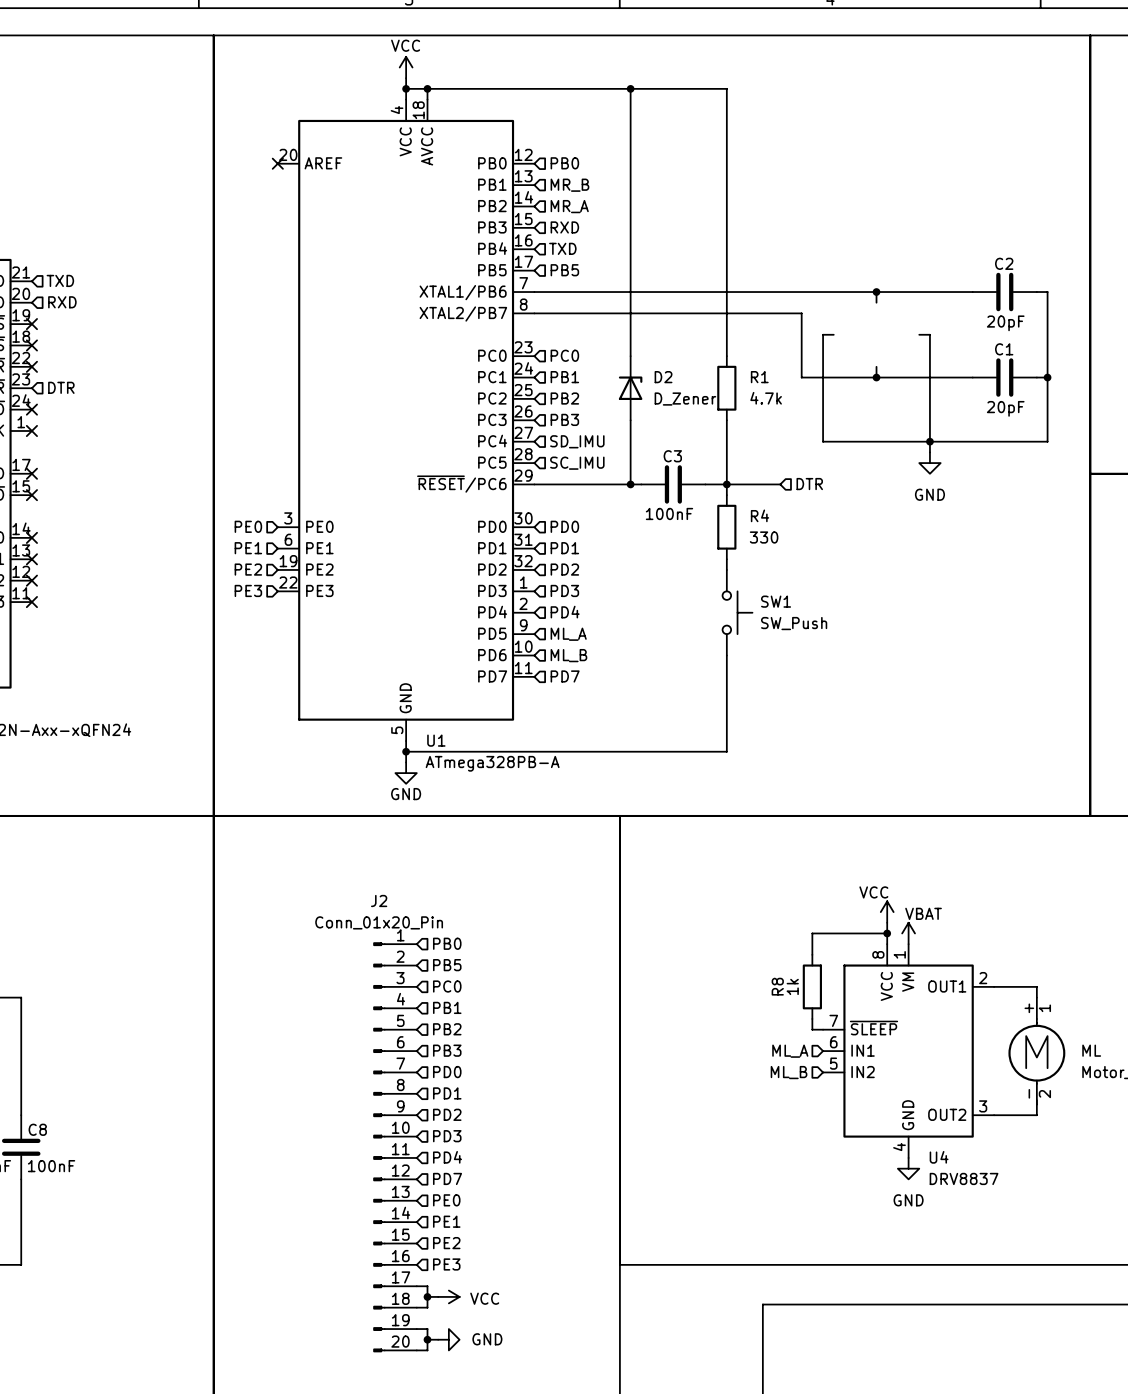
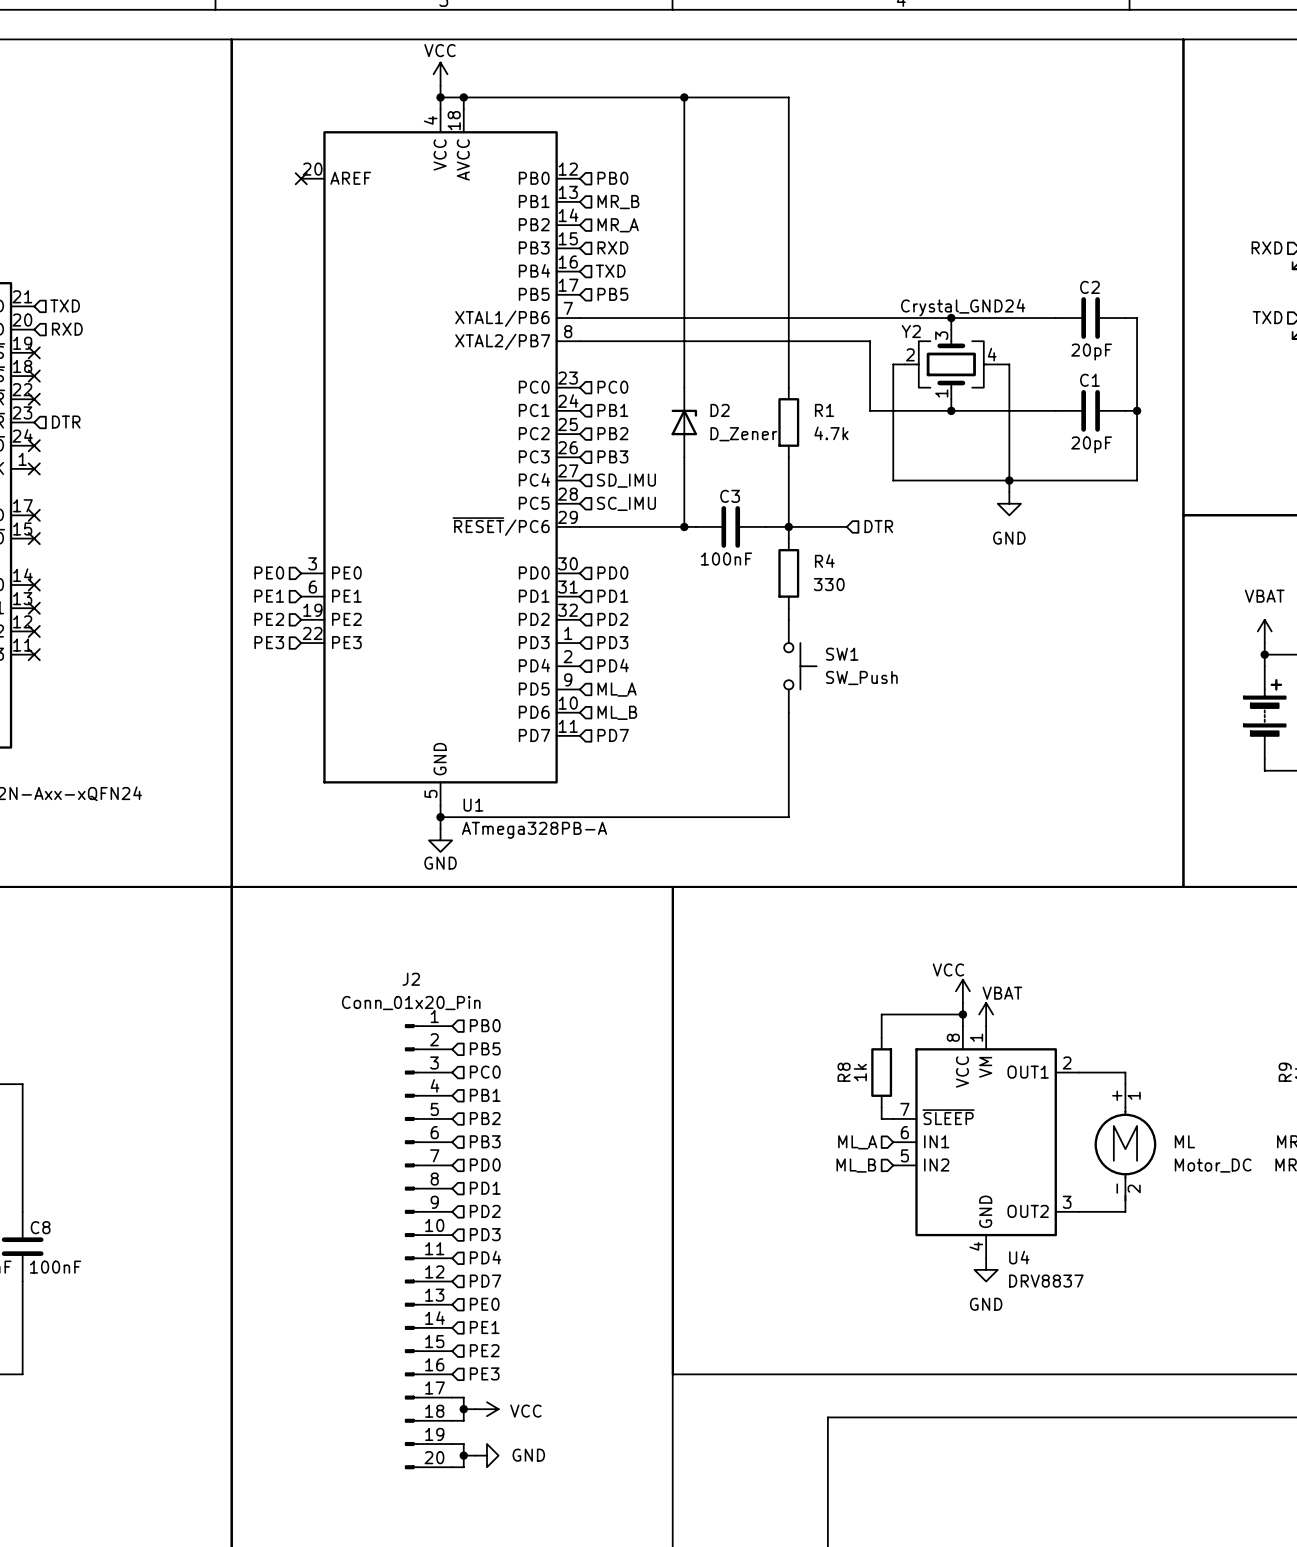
Y2: none -> Crystal_GND24 (951, 364)

